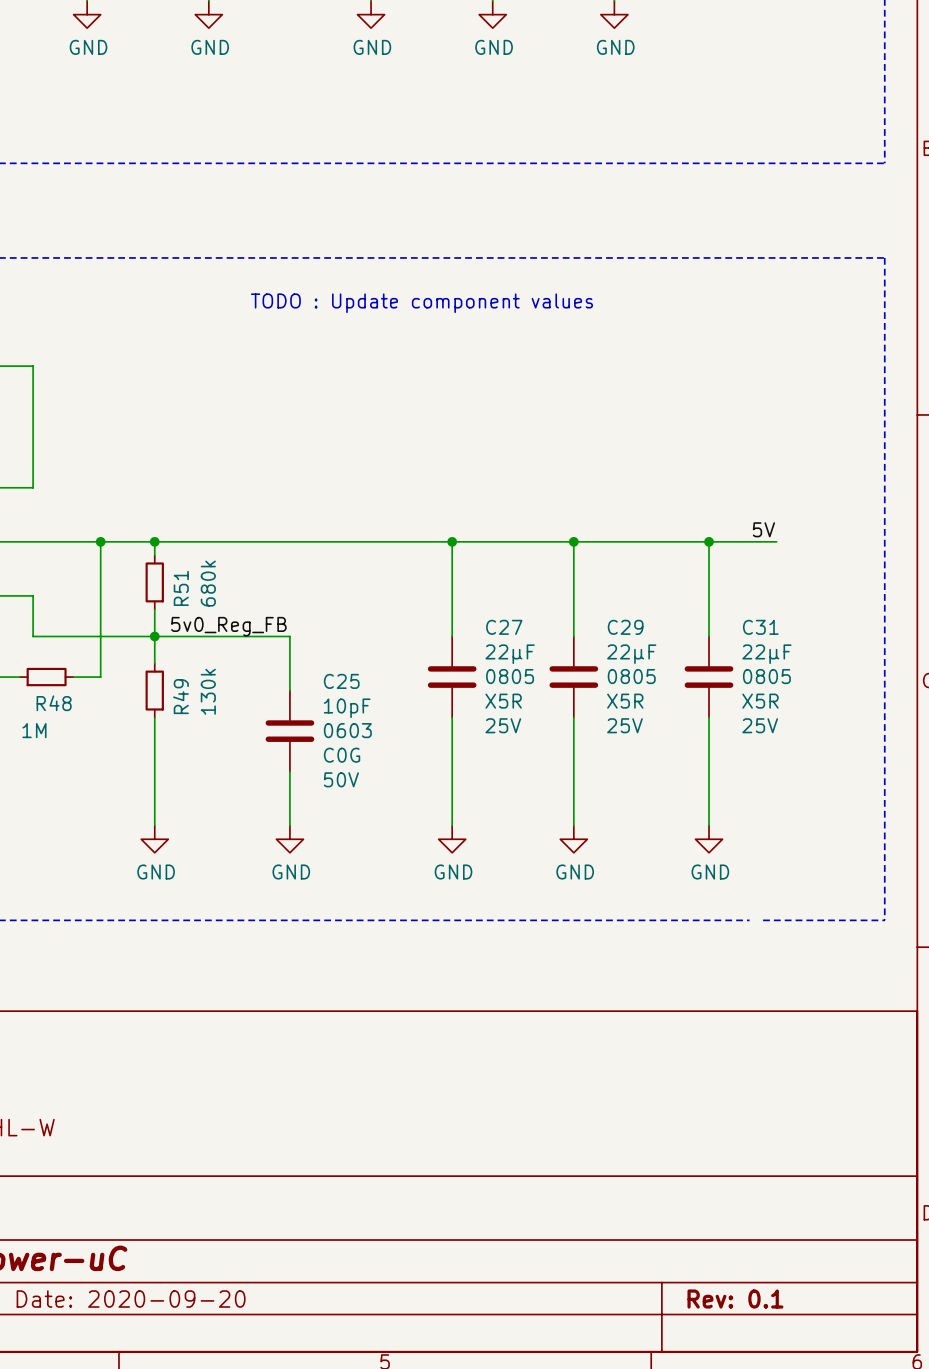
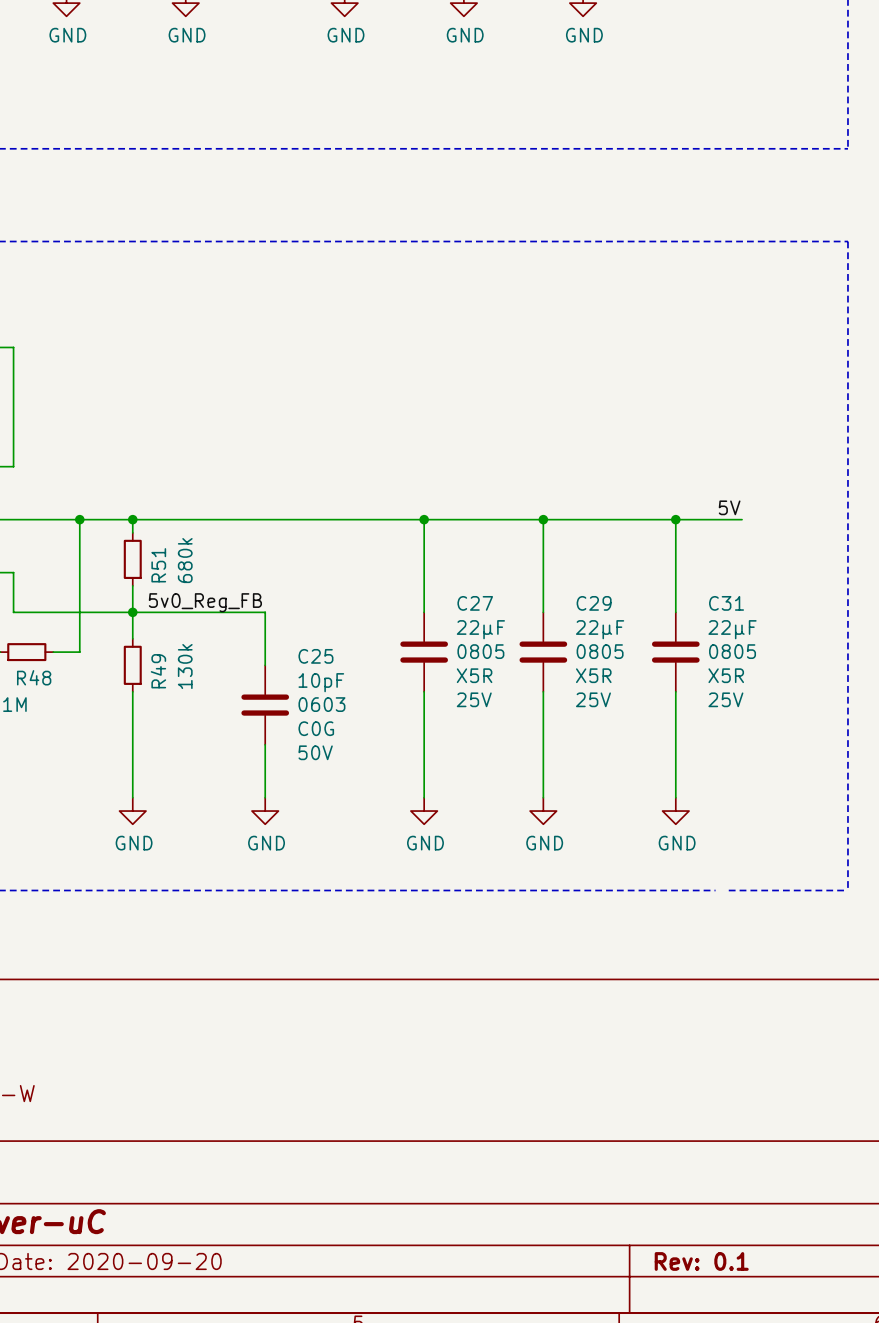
text: TODO : Update component values (422, 303) -> none

